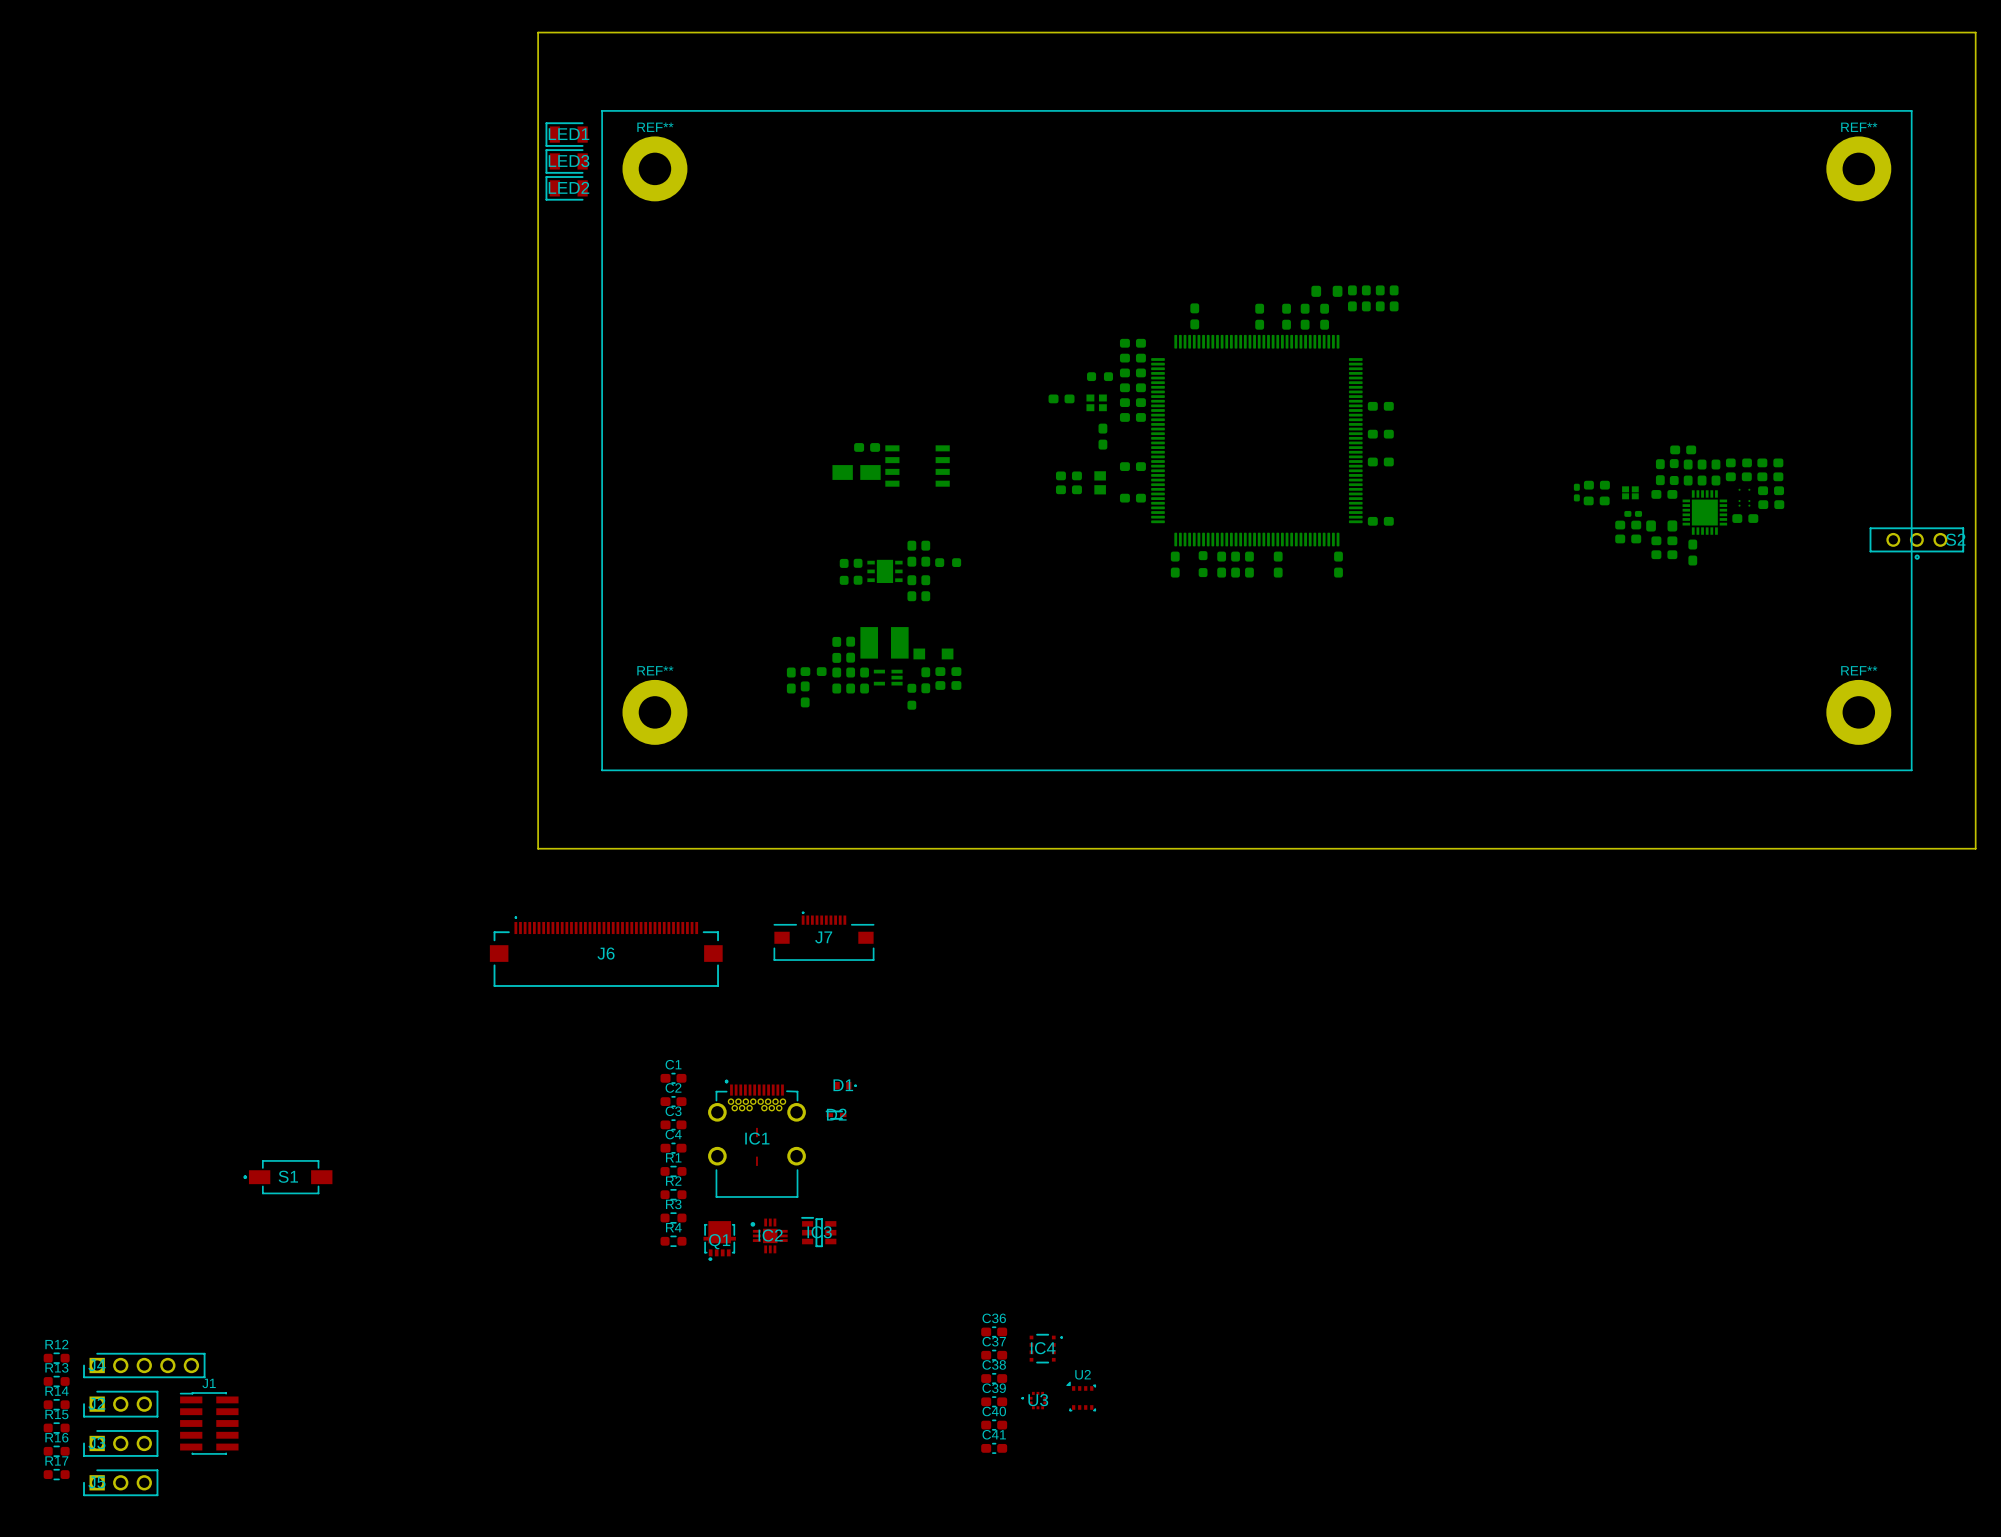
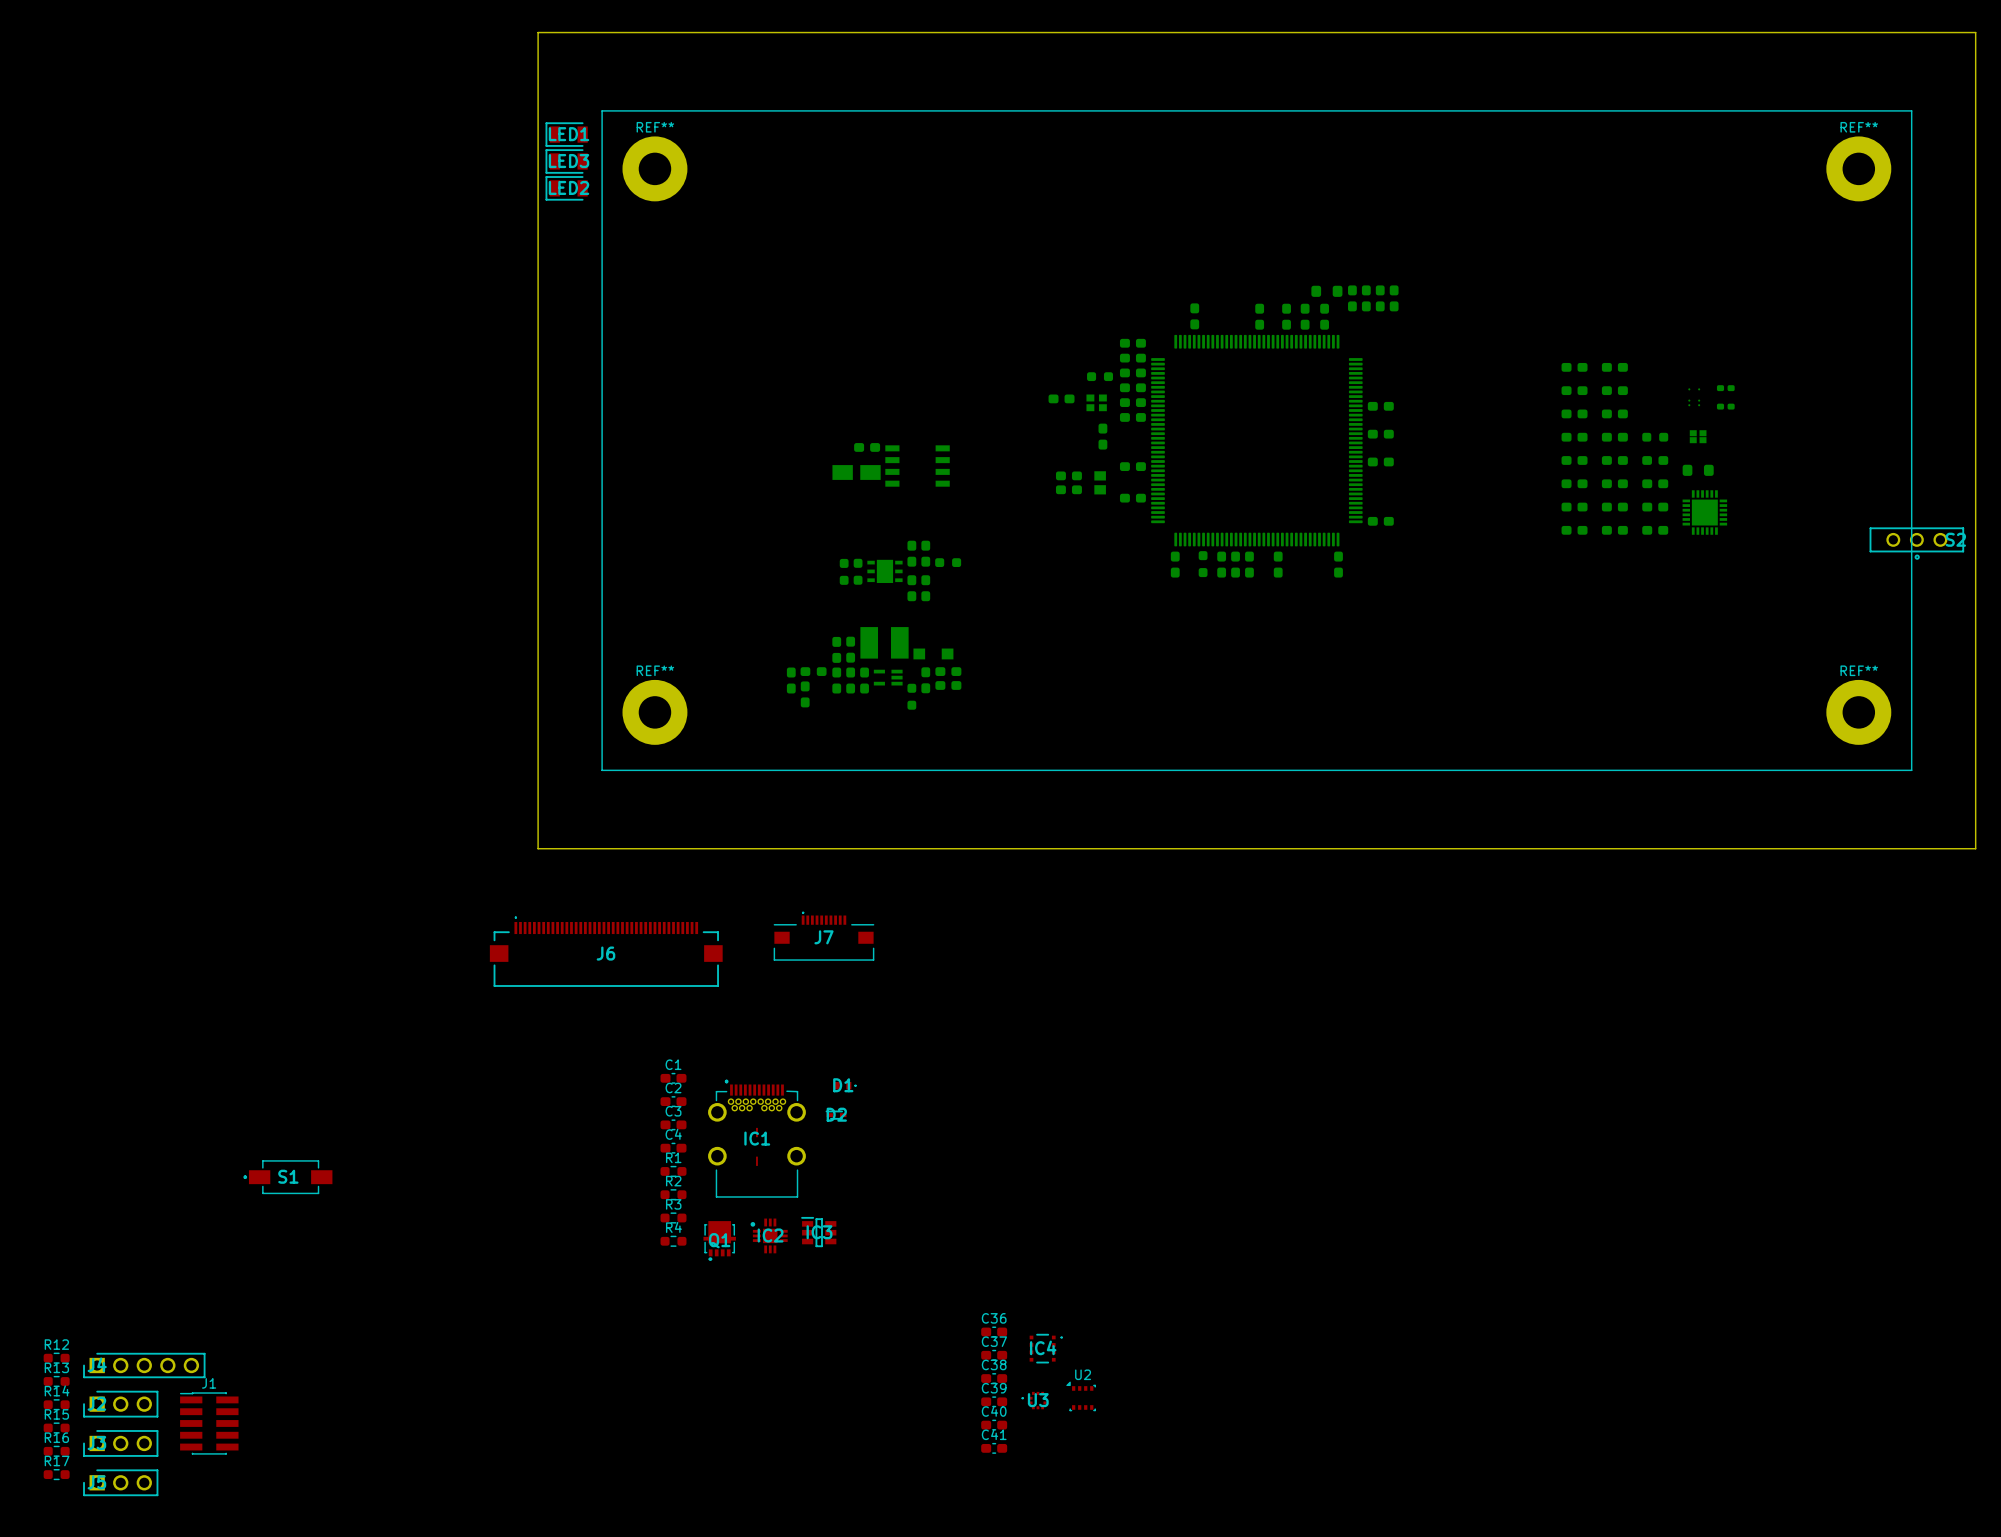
part: none -> (1574, 367)
part: none -> (1614, 367)
part: none -> (1725, 388)
part: none -> (1574, 390)
part: none -> (1614, 390)
part: none -> (1725, 406)
part: none -> (1574, 413)
part: none -> (1614, 413)
part: none -> (1574, 437)
part: none -> (1614, 437)
part: (1683, 449) -> none
part footprint: [1697, 459, 1707, 486] -> [1682, 464, 1714, 476]
part: none -> (1574, 460)
part: none -> (1614, 460)
part position: (1738, 462) -> (1655, 460)
part: (1770, 462) -> none
part: (1660, 472) -> none
part rotation: 0° (1674, 472) -> 90° clockwise (1655, 437)
part position: (1674, 472) -> (1655, 437)
part: (1688, 472) -> none
part: (1715, 472) -> none
part: (1738, 476) -> none
part: (1770, 476) -> none
part: none -> (1574, 483)
part: none -> (1614, 483)
part: none -> (1655, 483)
part: (1596, 485) -> none
part: (1771, 490) -> none
part: (1576, 492) -> none
part position: (1630, 492) -> (1698, 436)
part: (1664, 494) -> none
part position: (1744, 497) -> (1694, 397)
part: (1596, 500) -> none
part: (1771, 504) -> none
part: none -> (1574, 507)
part: none -> (1614, 507)
part: none -> (1655, 507)
part: (1633, 513) -> none
part: (1745, 518) -> none
part: (1628, 525) -> none
part: (1661, 525) -> none
part: none -> (1574, 530)
part: none -> (1614, 530)
part: none -> (1655, 530)
part: (1628, 538) -> none
part: (1664, 540) -> none
part: (1692, 552) -> none
part: (1664, 554) -> none

